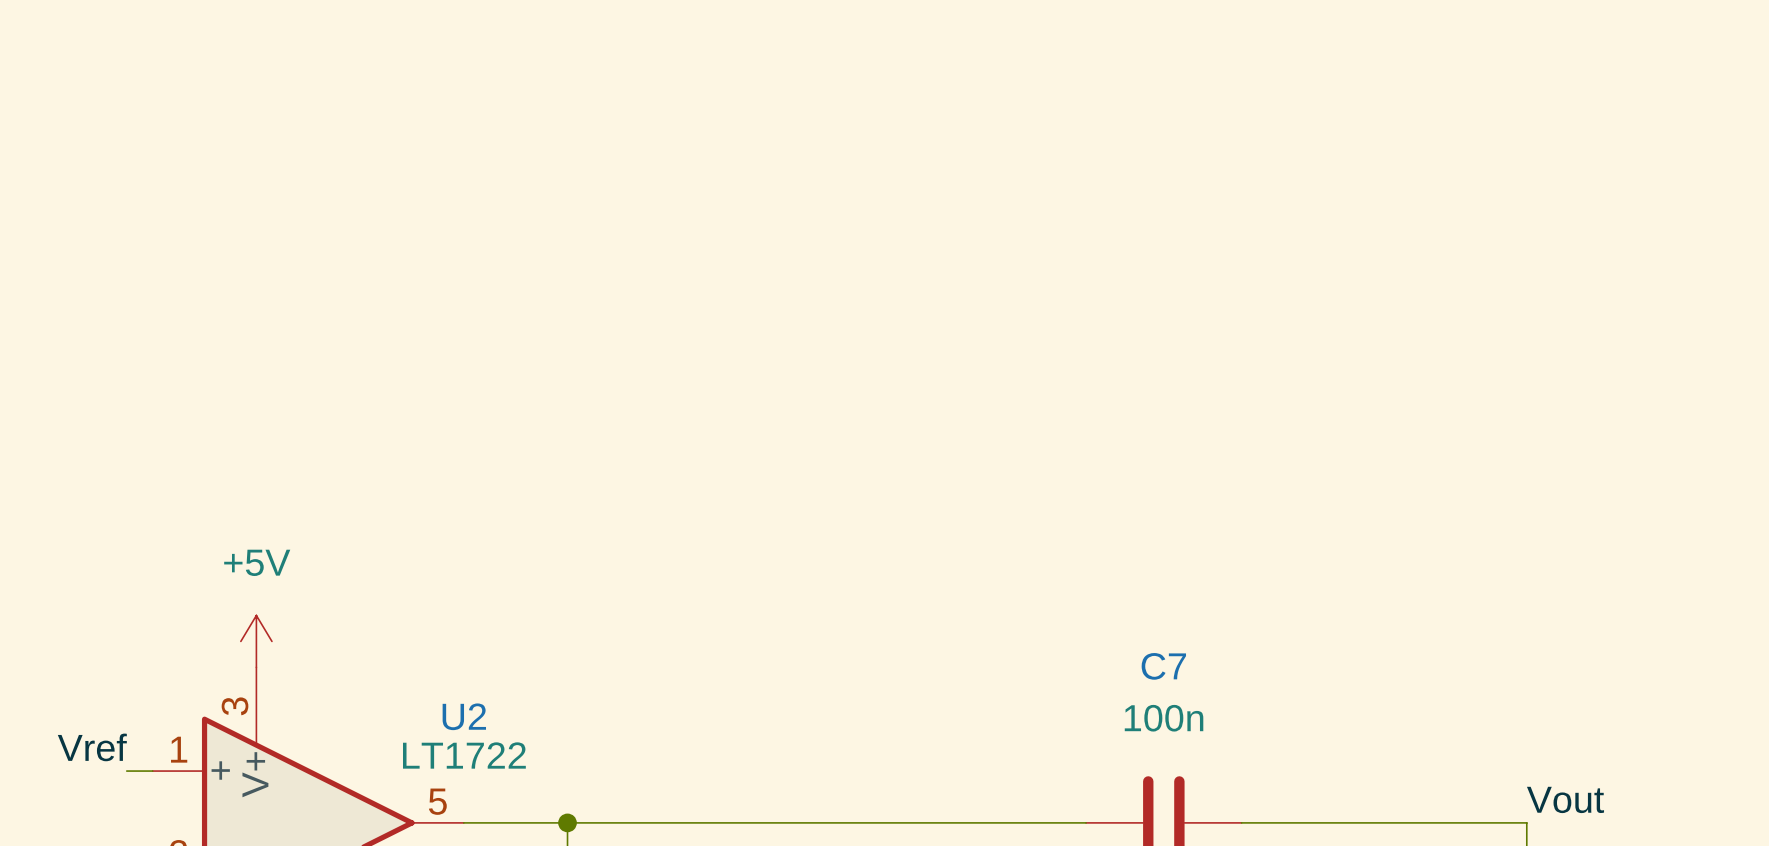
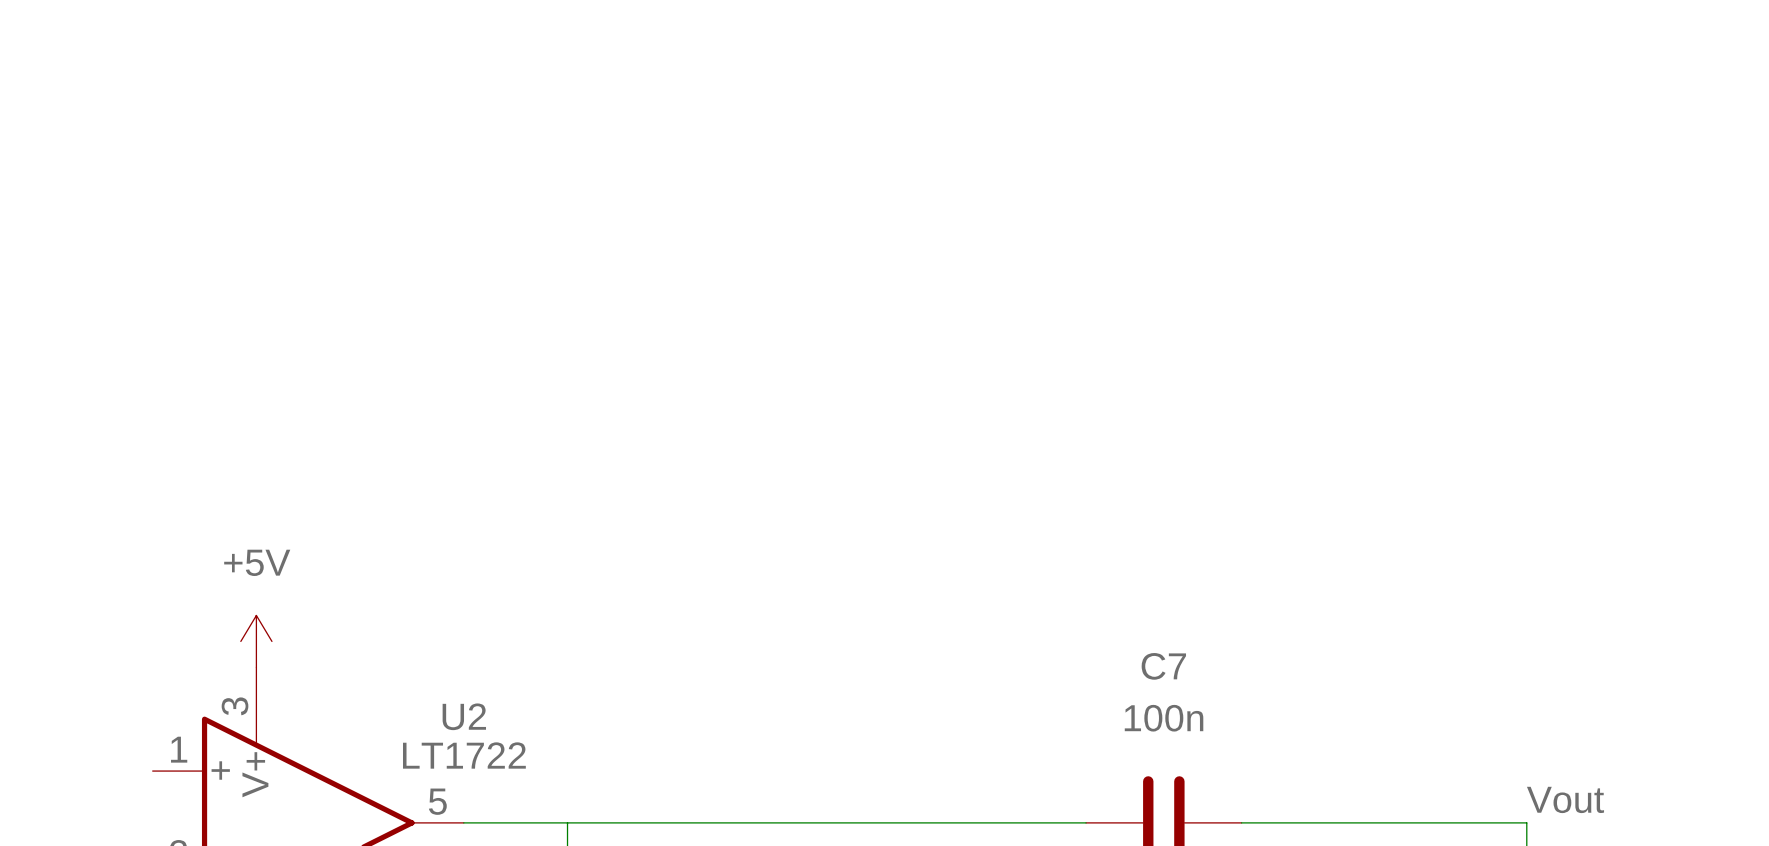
label: Vref (92, 747) -> none
wire: (126, 771) (152, 771) -> none
junction: (567, 822) -> none

